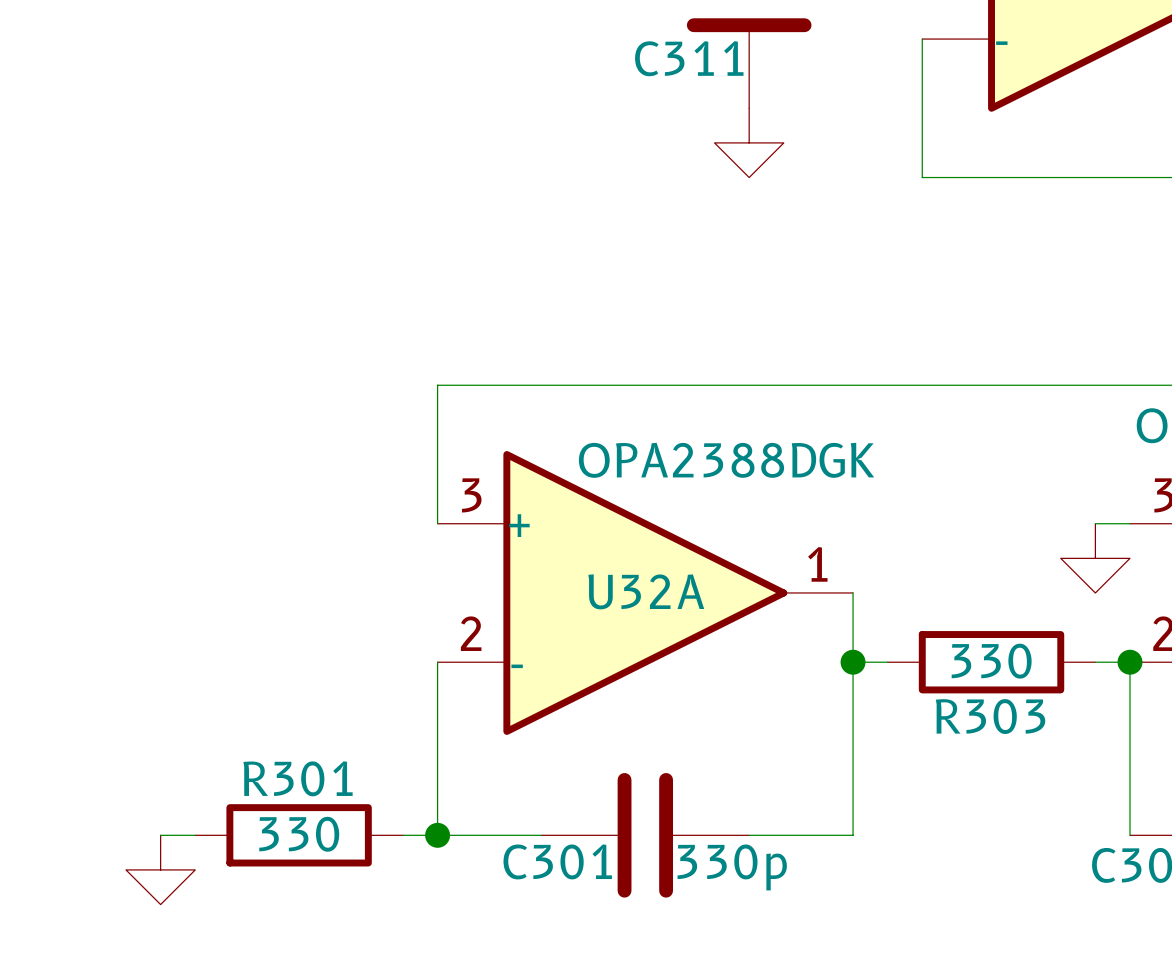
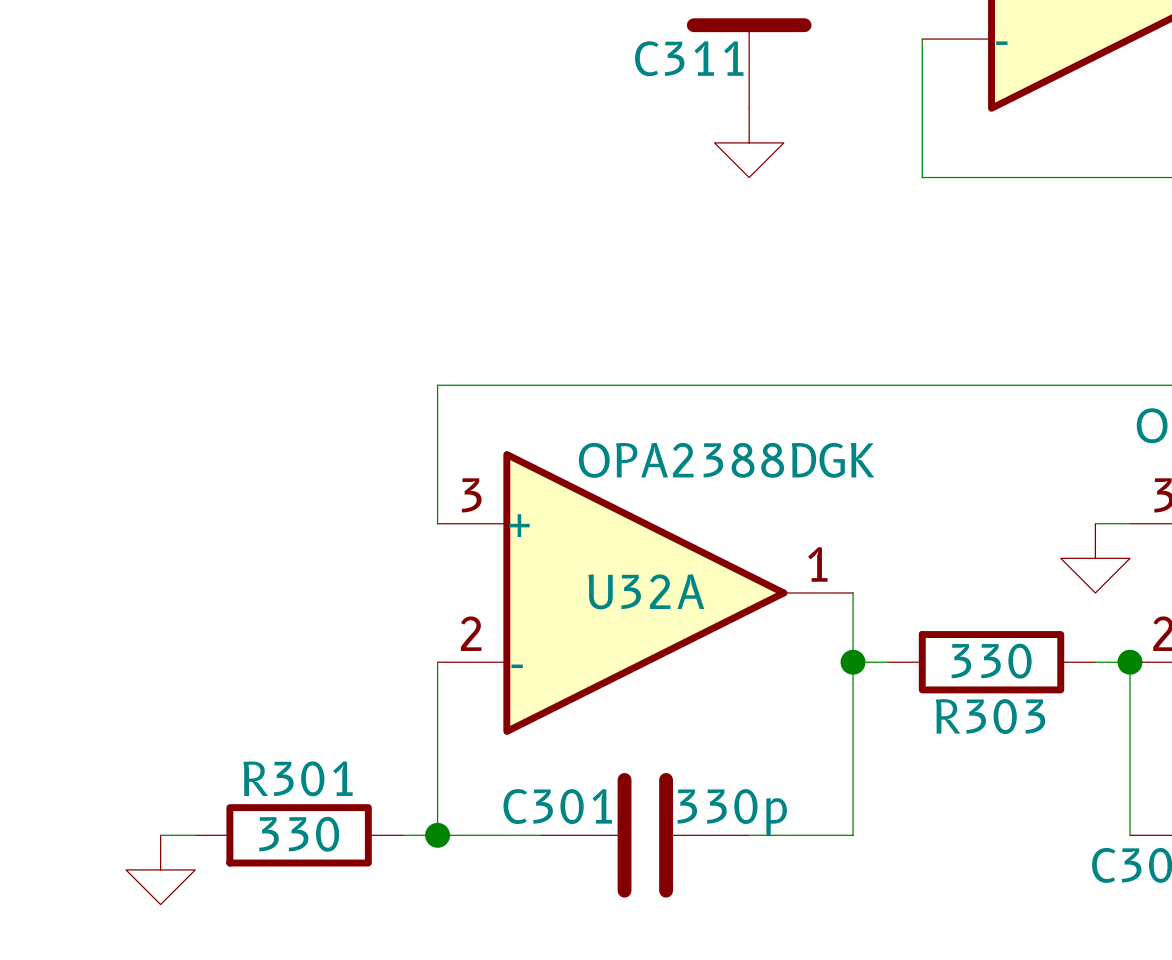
C301 name position: C301 (557, 861) -> C301 (557, 806)
C301 value position: 330p (732, 867) -> 330p (732, 812)

